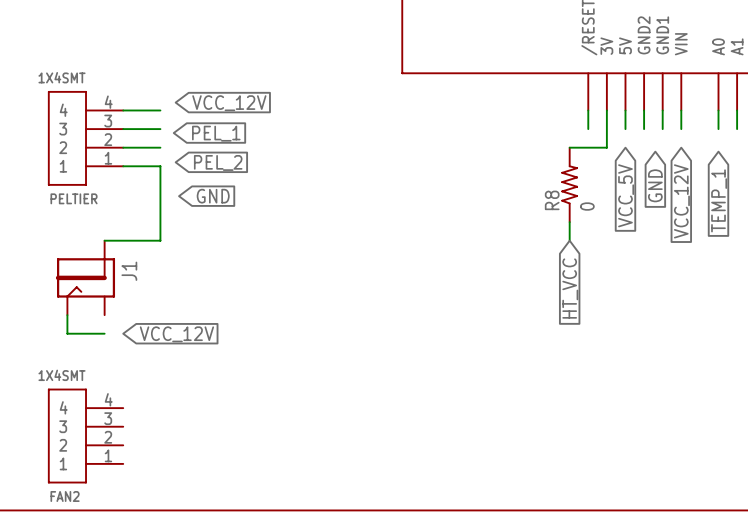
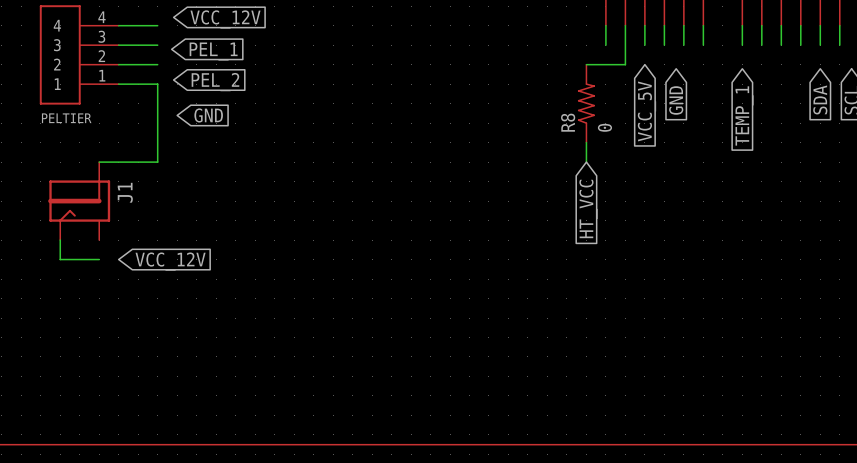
global label: VCC_12V (681, 201) -> none
FAN2: 1X4SMT (85, 436) -> none

